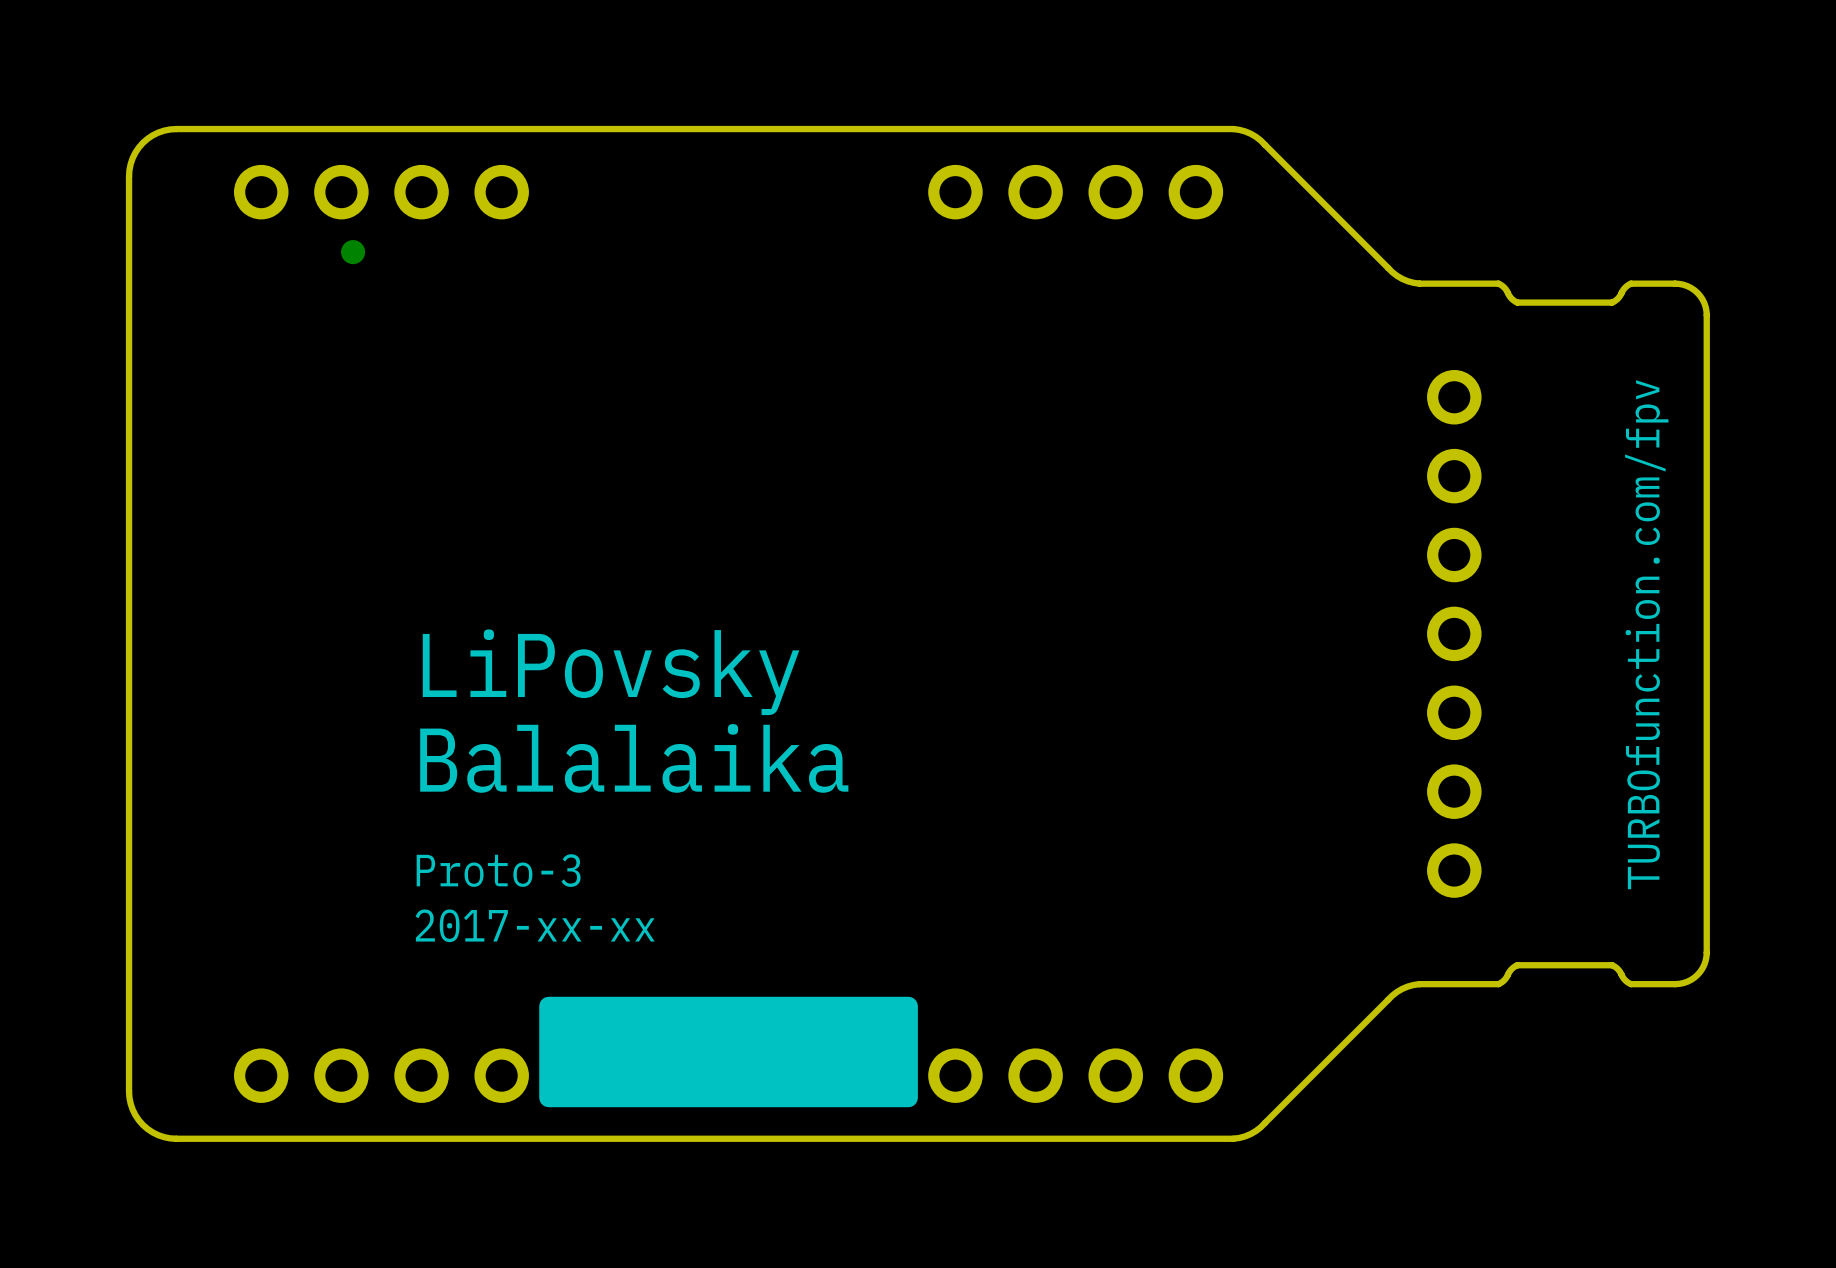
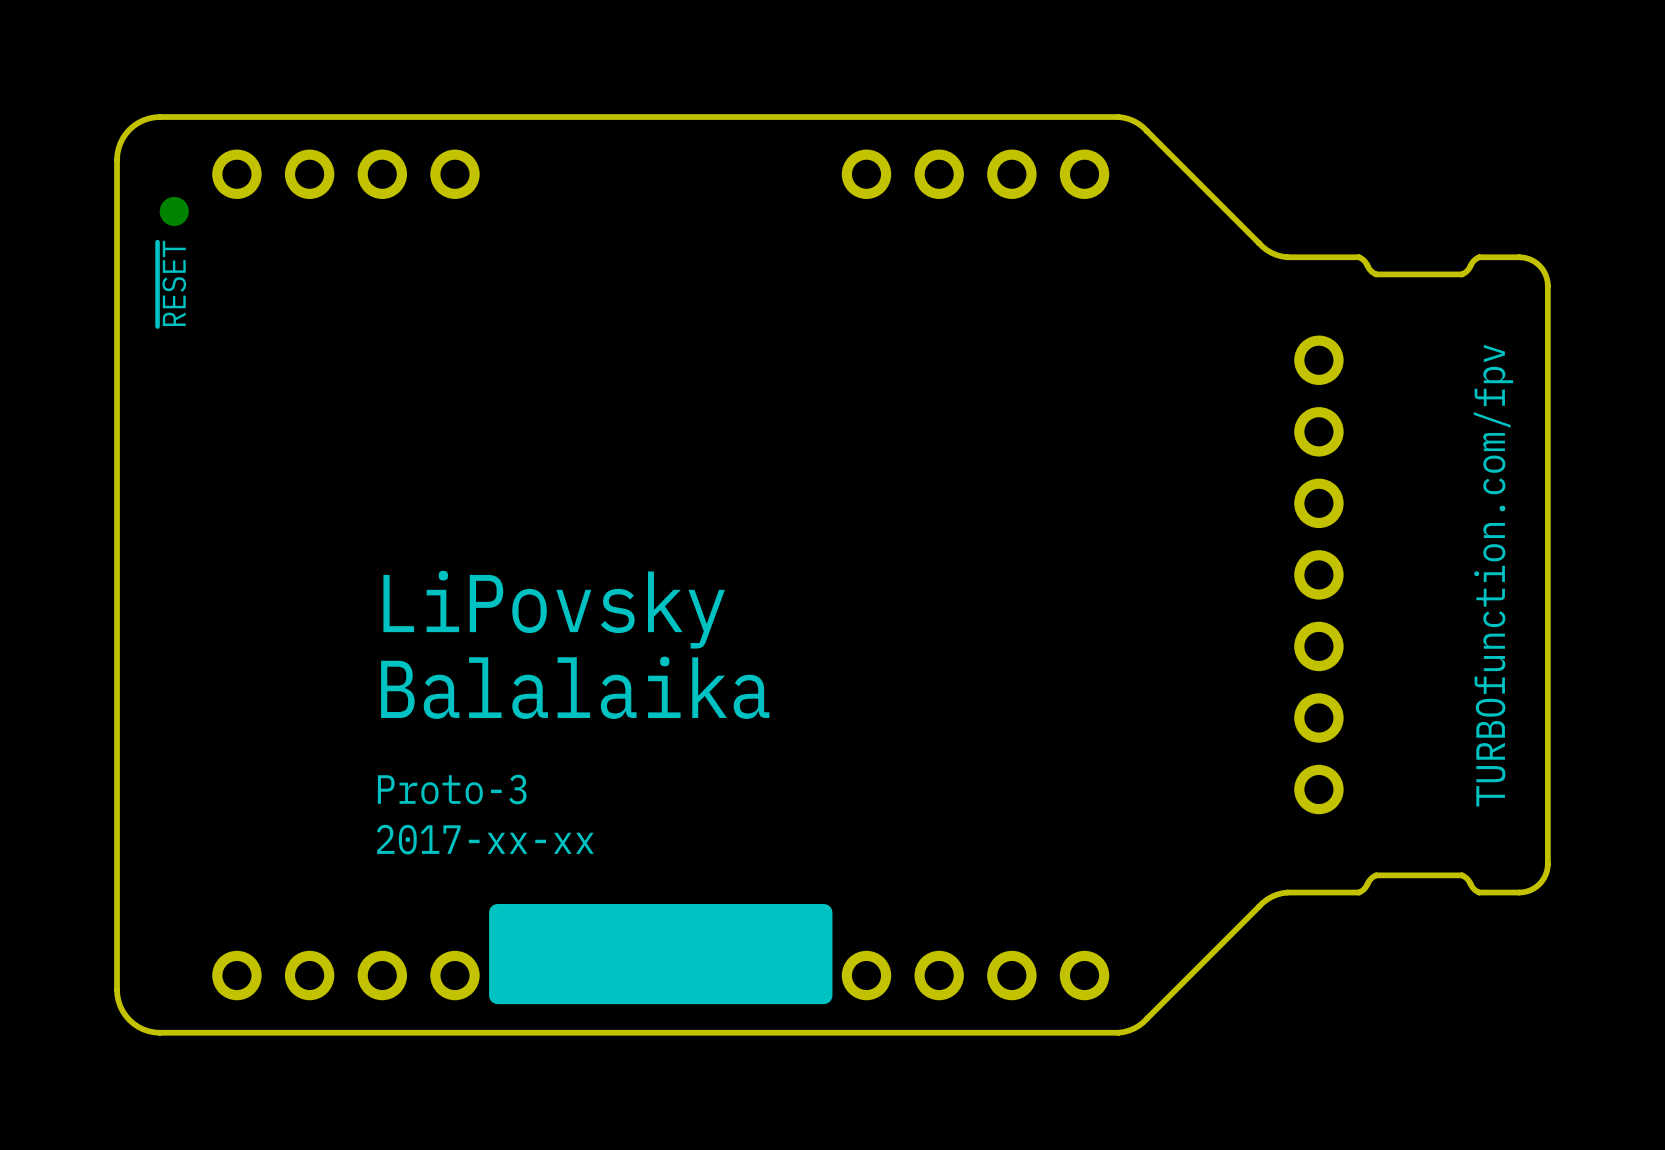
part: none -> (174, 211)
part: (353, 252) -> none
text: none -> ~{RESET} (171, 283)

